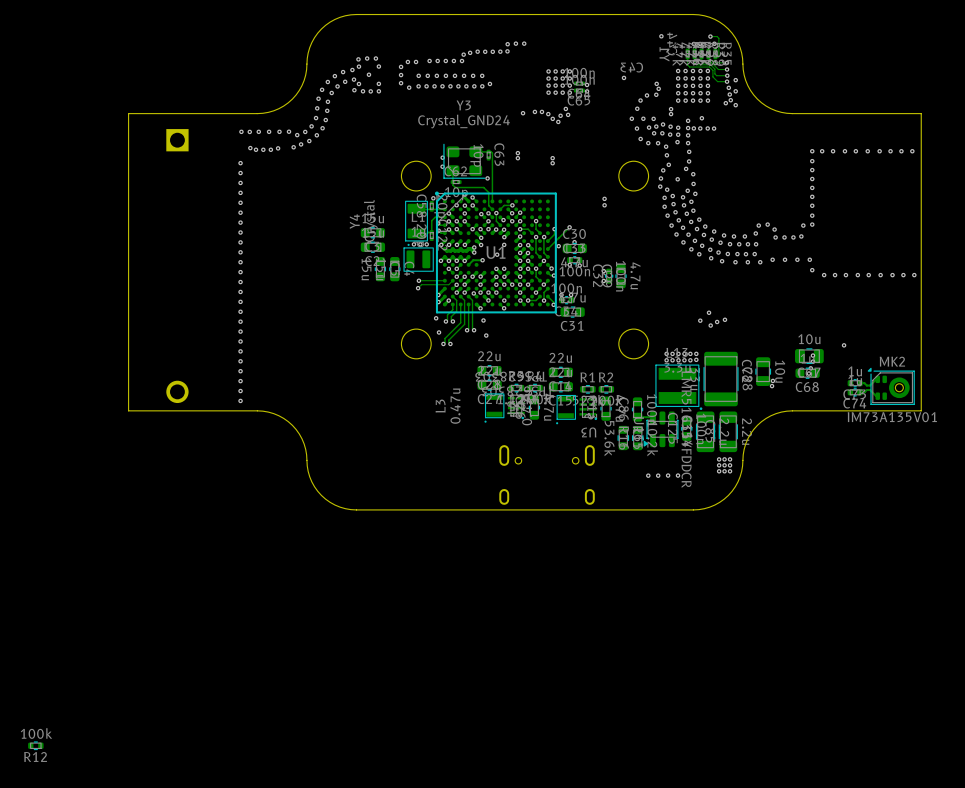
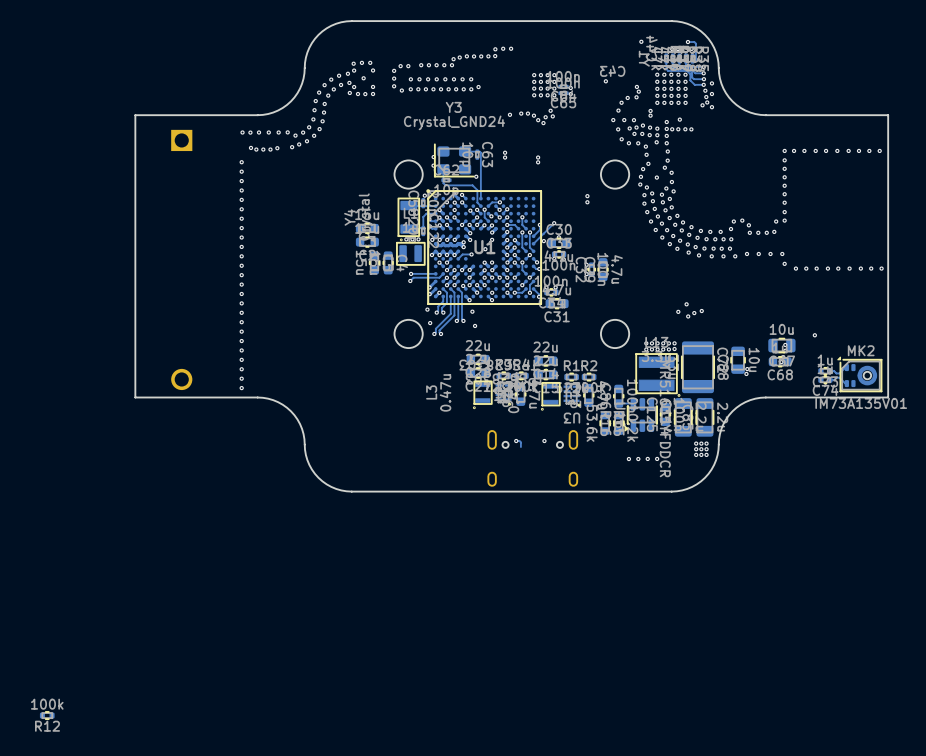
track: none -> (516, 441) (520, 442) (520, 447)
via: none -> (516, 441)
via: none -> (544, 441)

